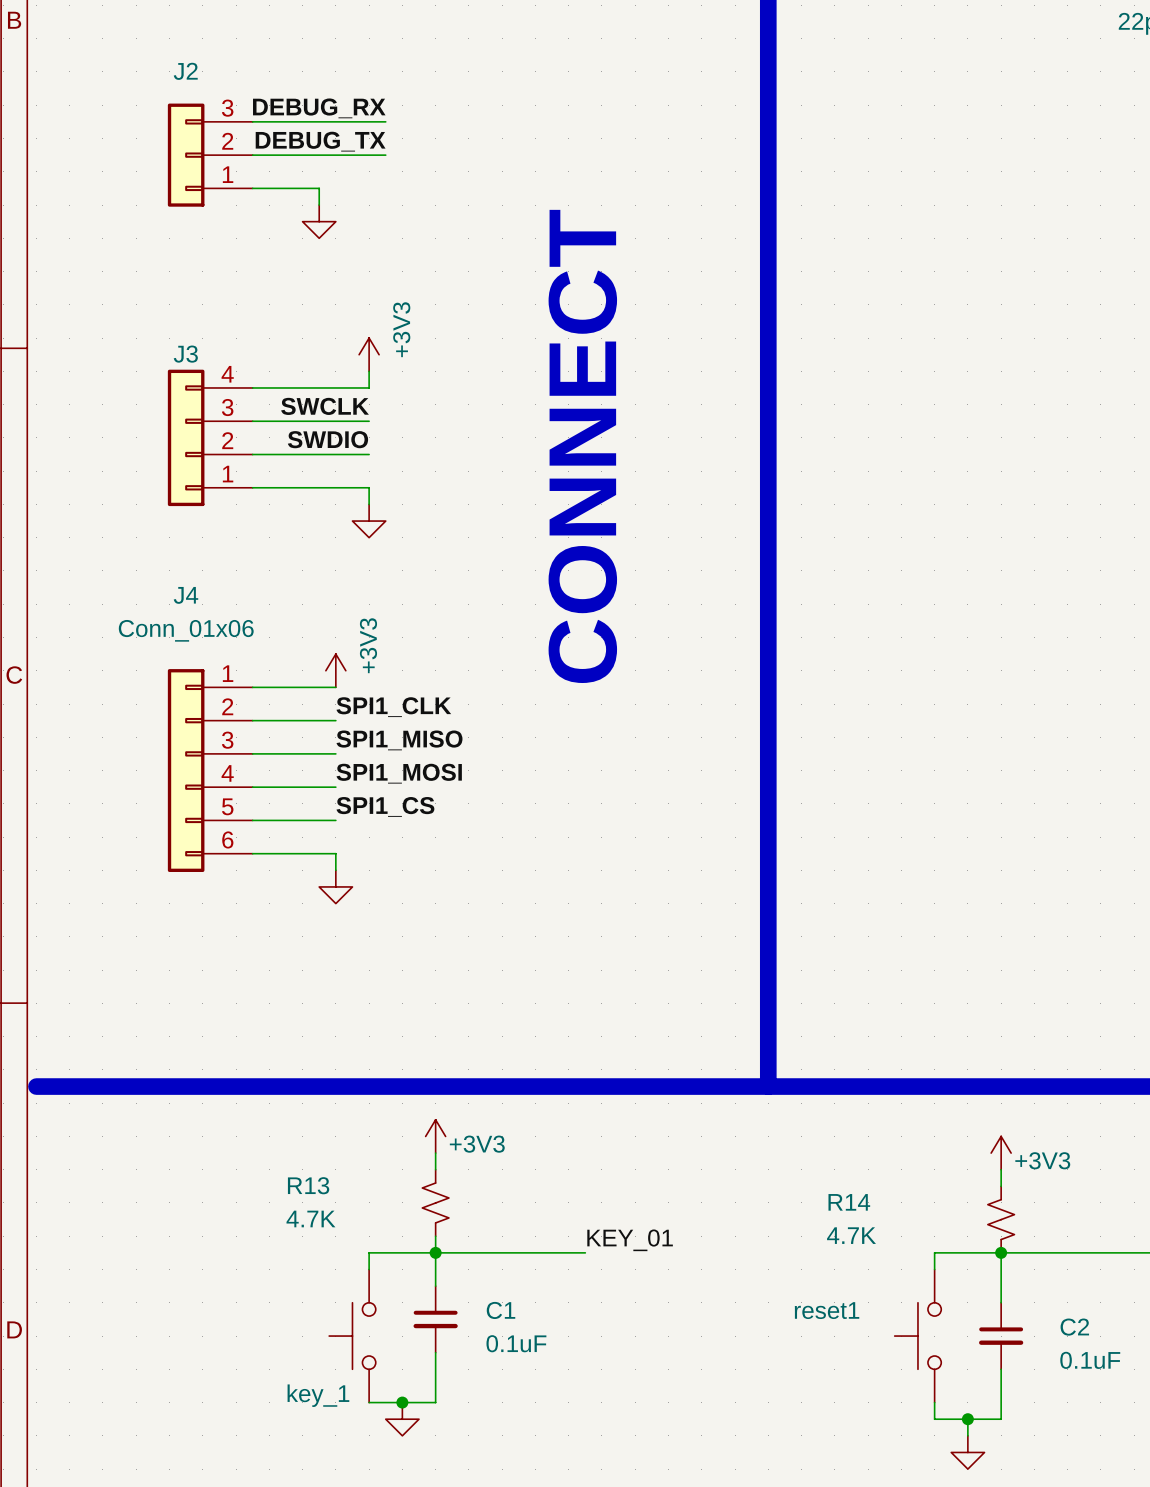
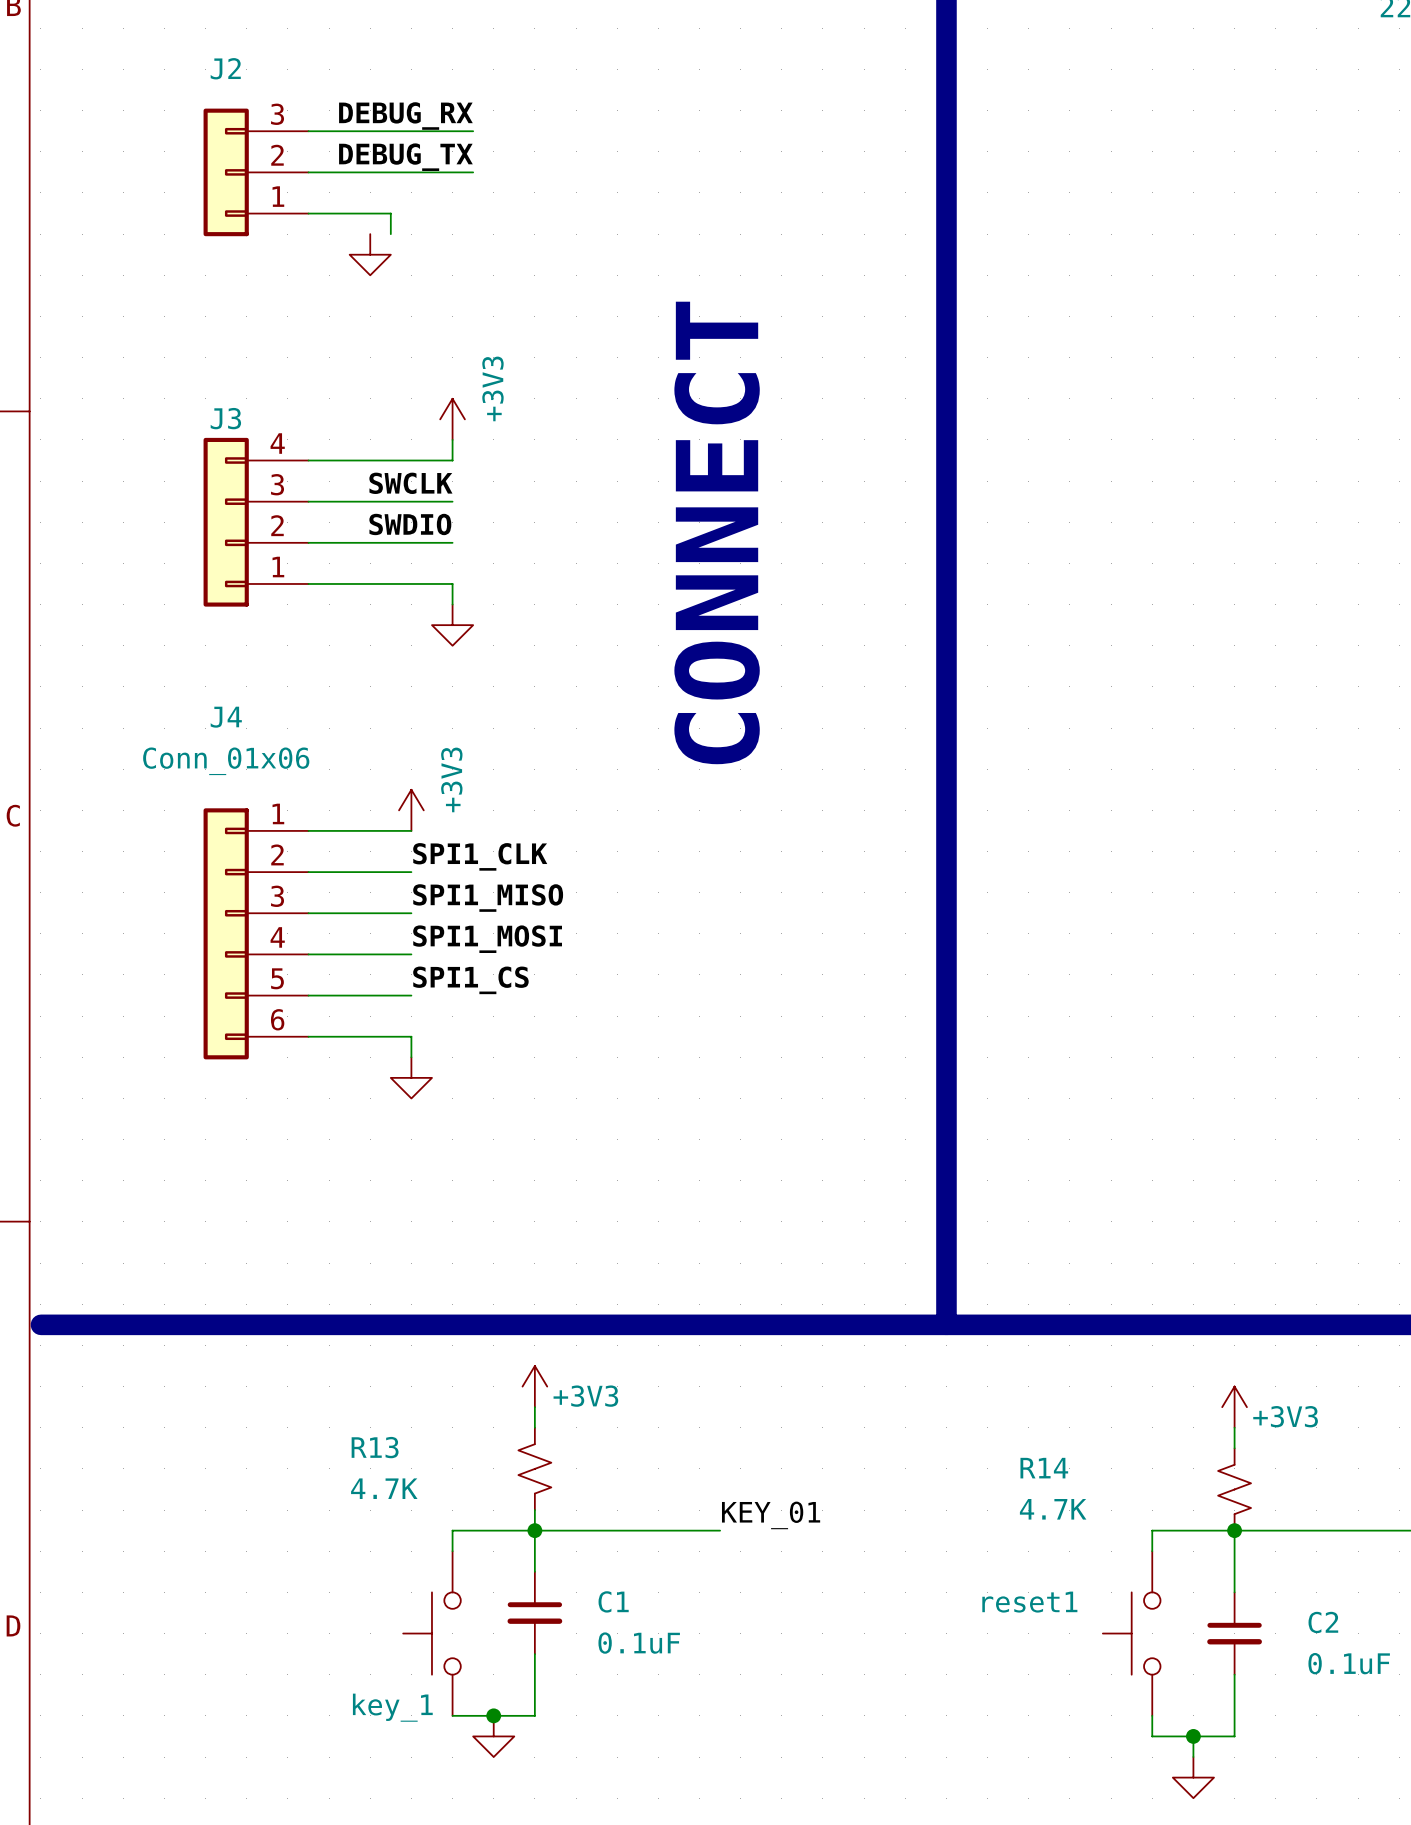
power symbol position: (319, 221) -> (370, 254)

